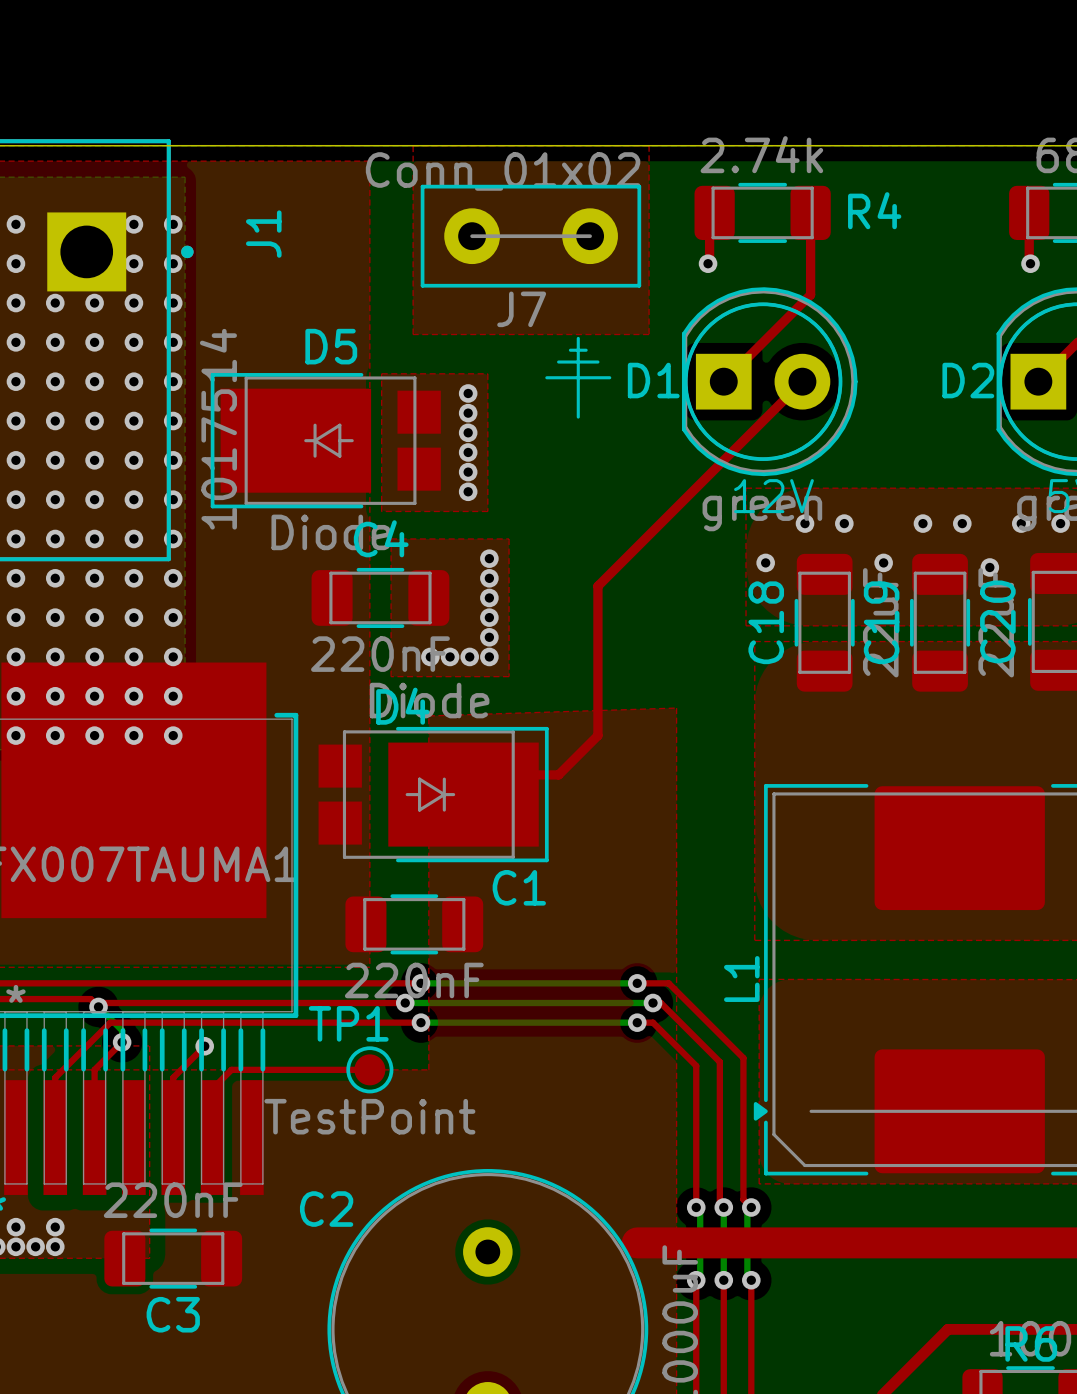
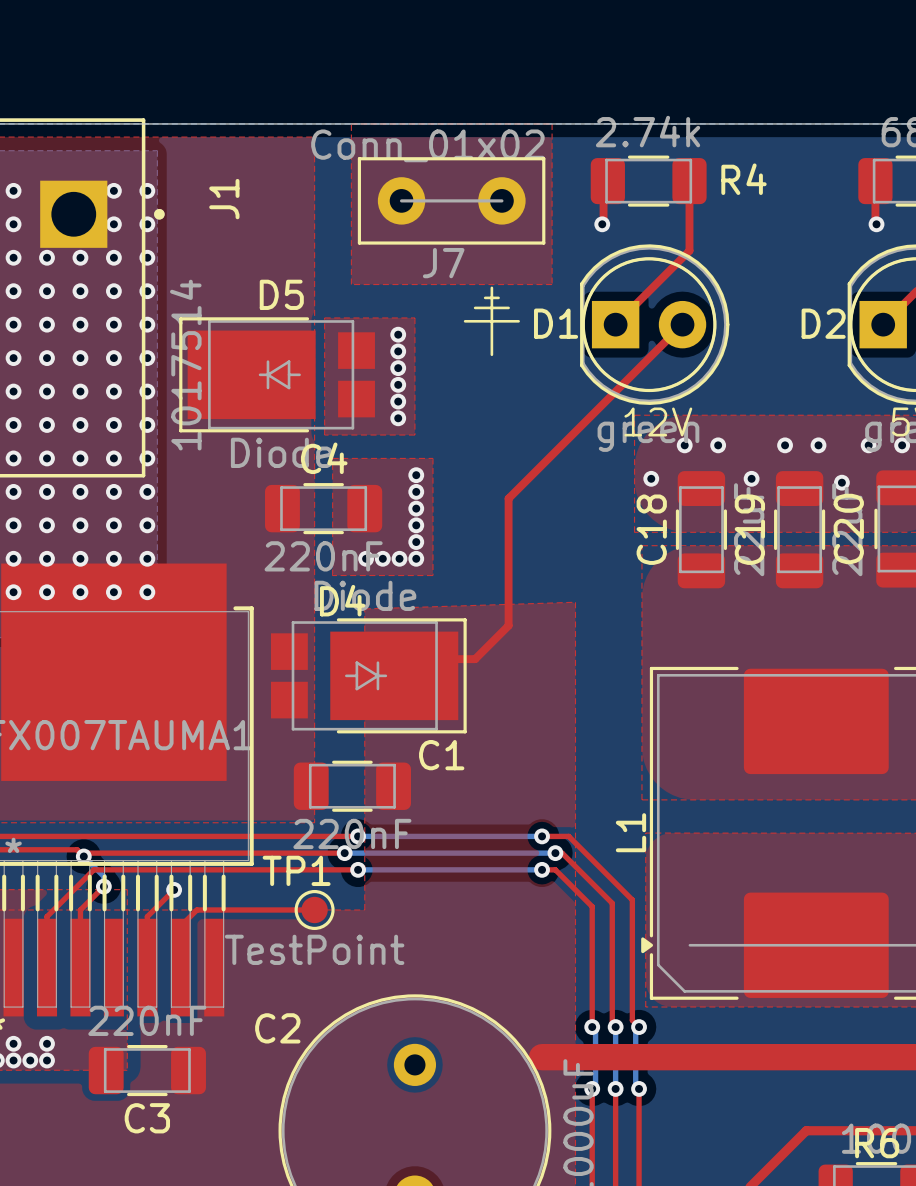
via: (15, 735) -> none
via: (55, 735) -> none
via: (94, 735) -> none
via: (133, 735) -> none
via: (173, 735) -> none

